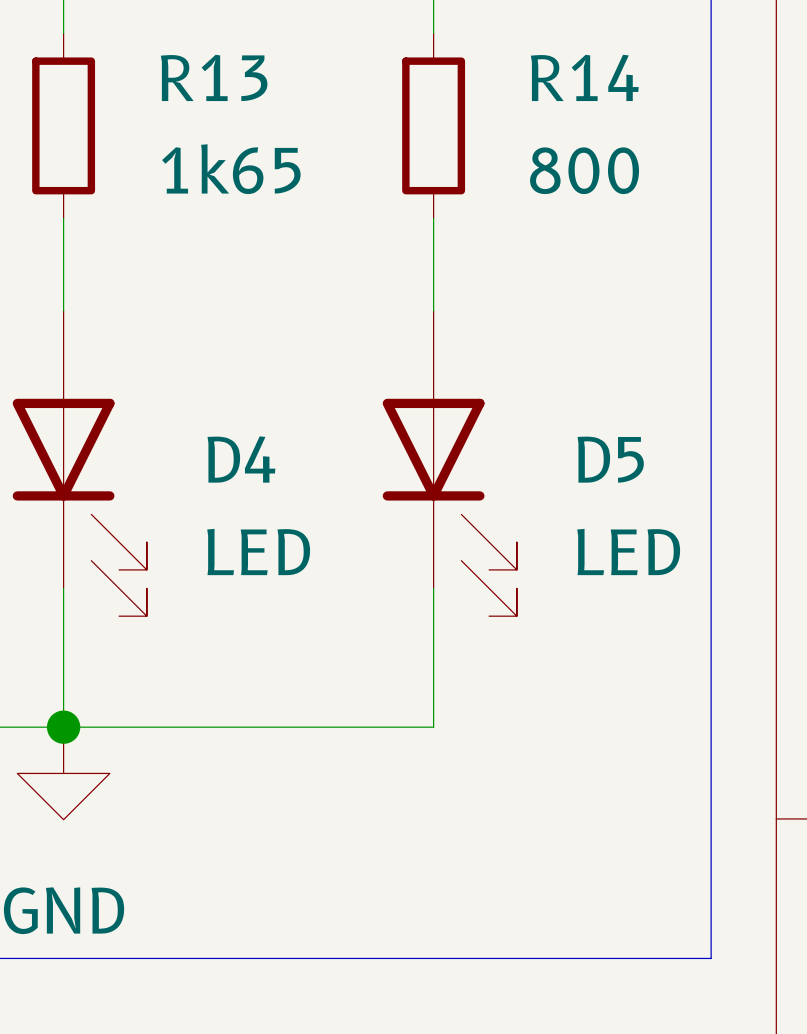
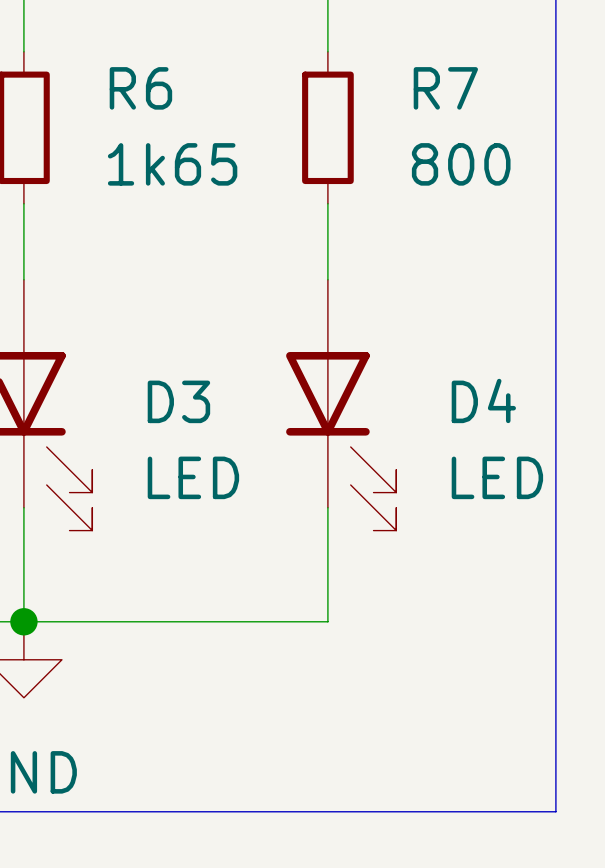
R13 name: R13 (214, 77) -> R6 (140, 88)
R14 name: R14 (584, 77) -> R7 (445, 88)
D4 name: D4 (241, 459) -> D3 (178, 401)
D5 name: D5 (610, 459) -> D4 (483, 400)

